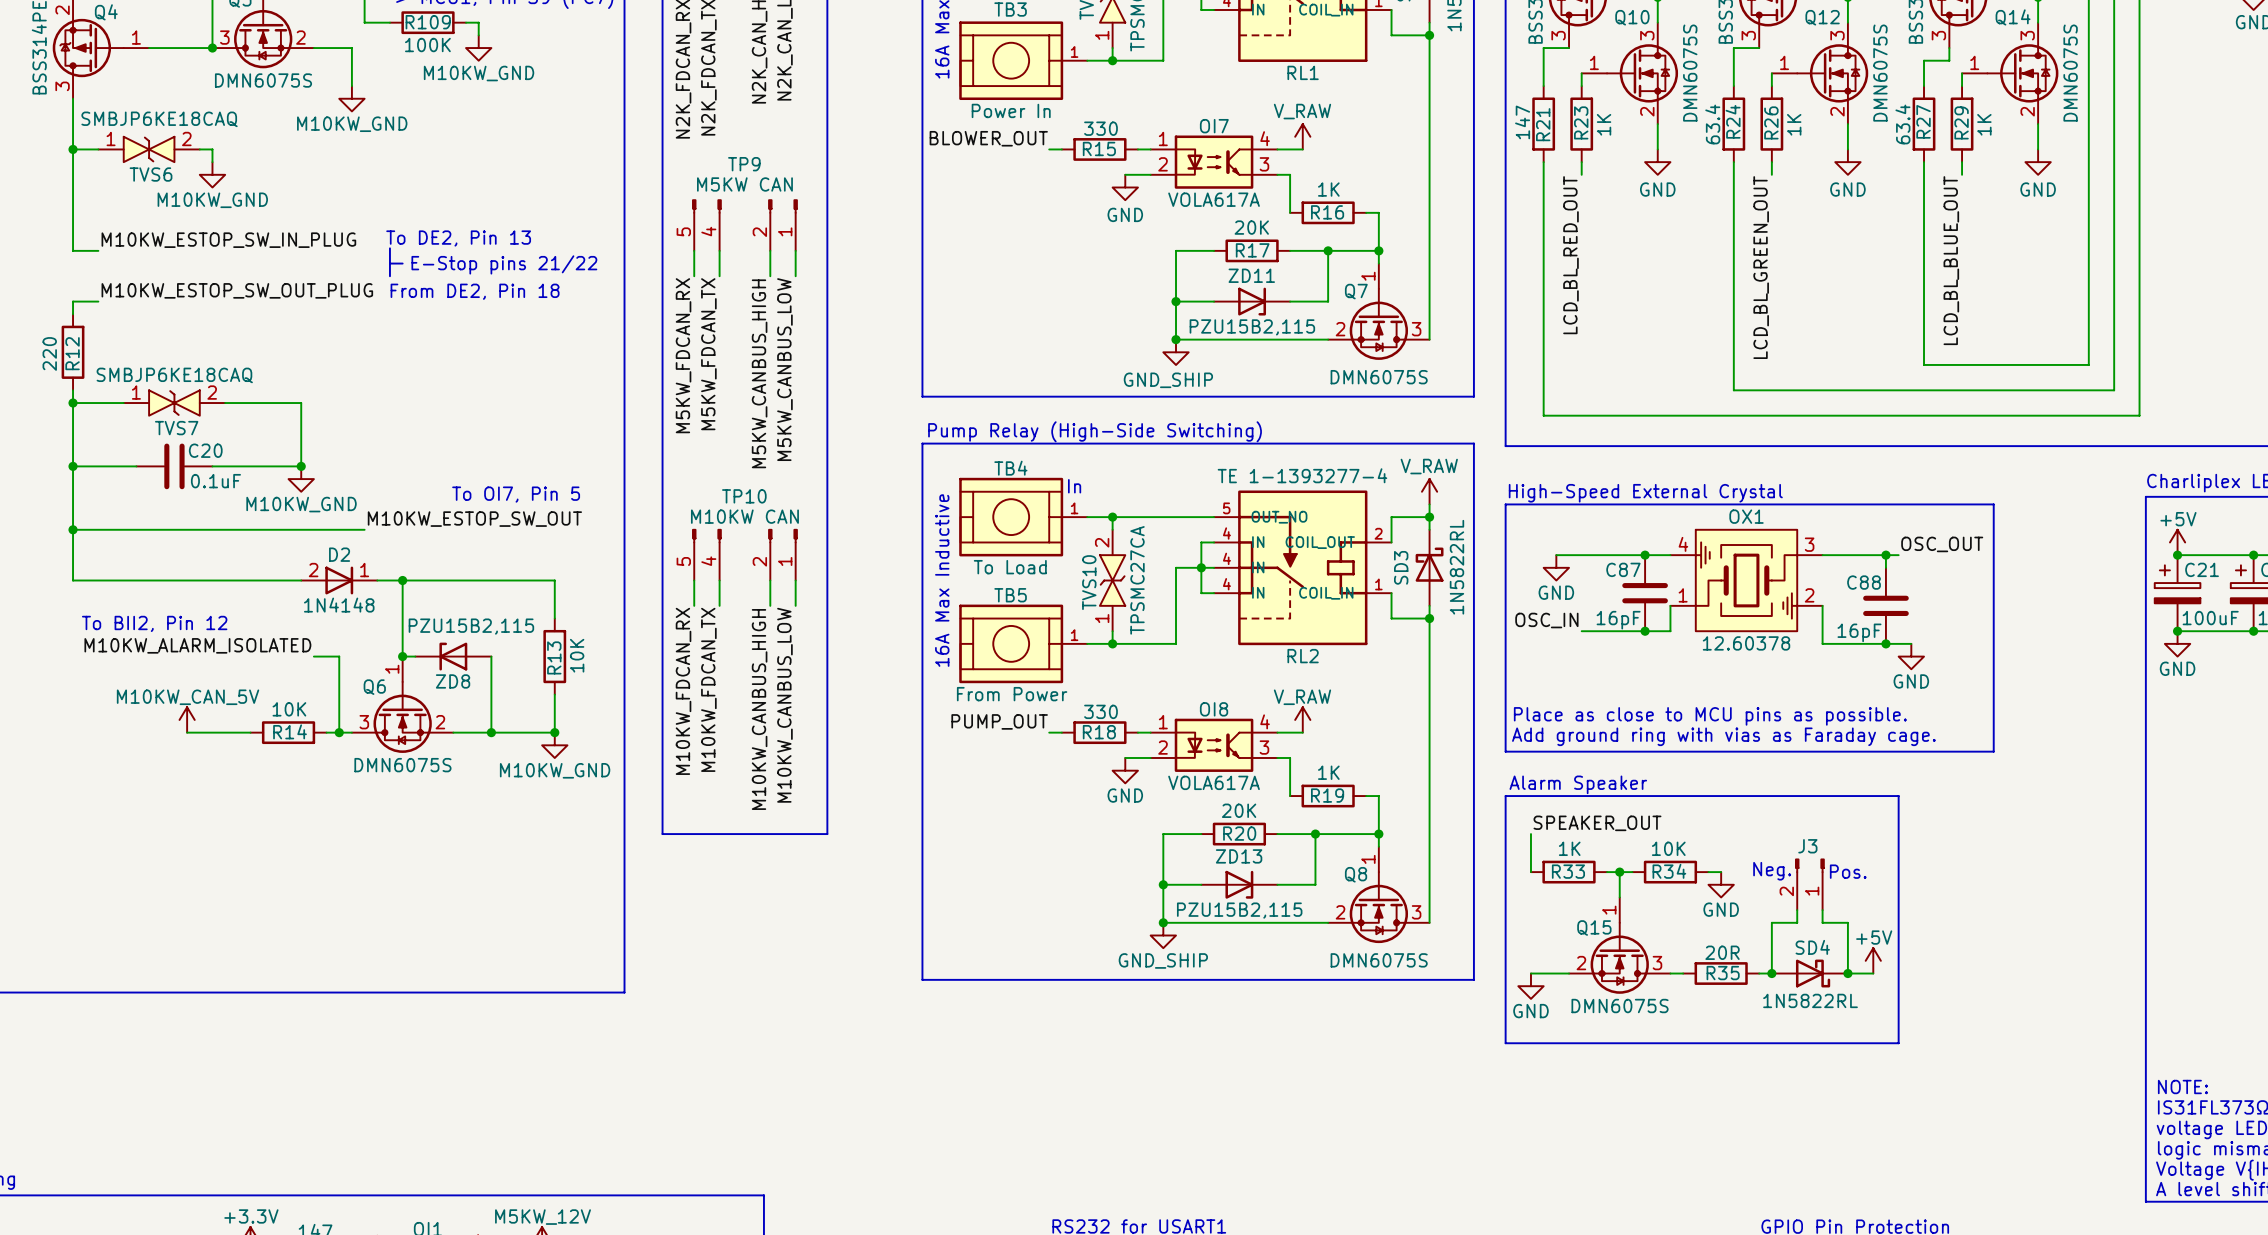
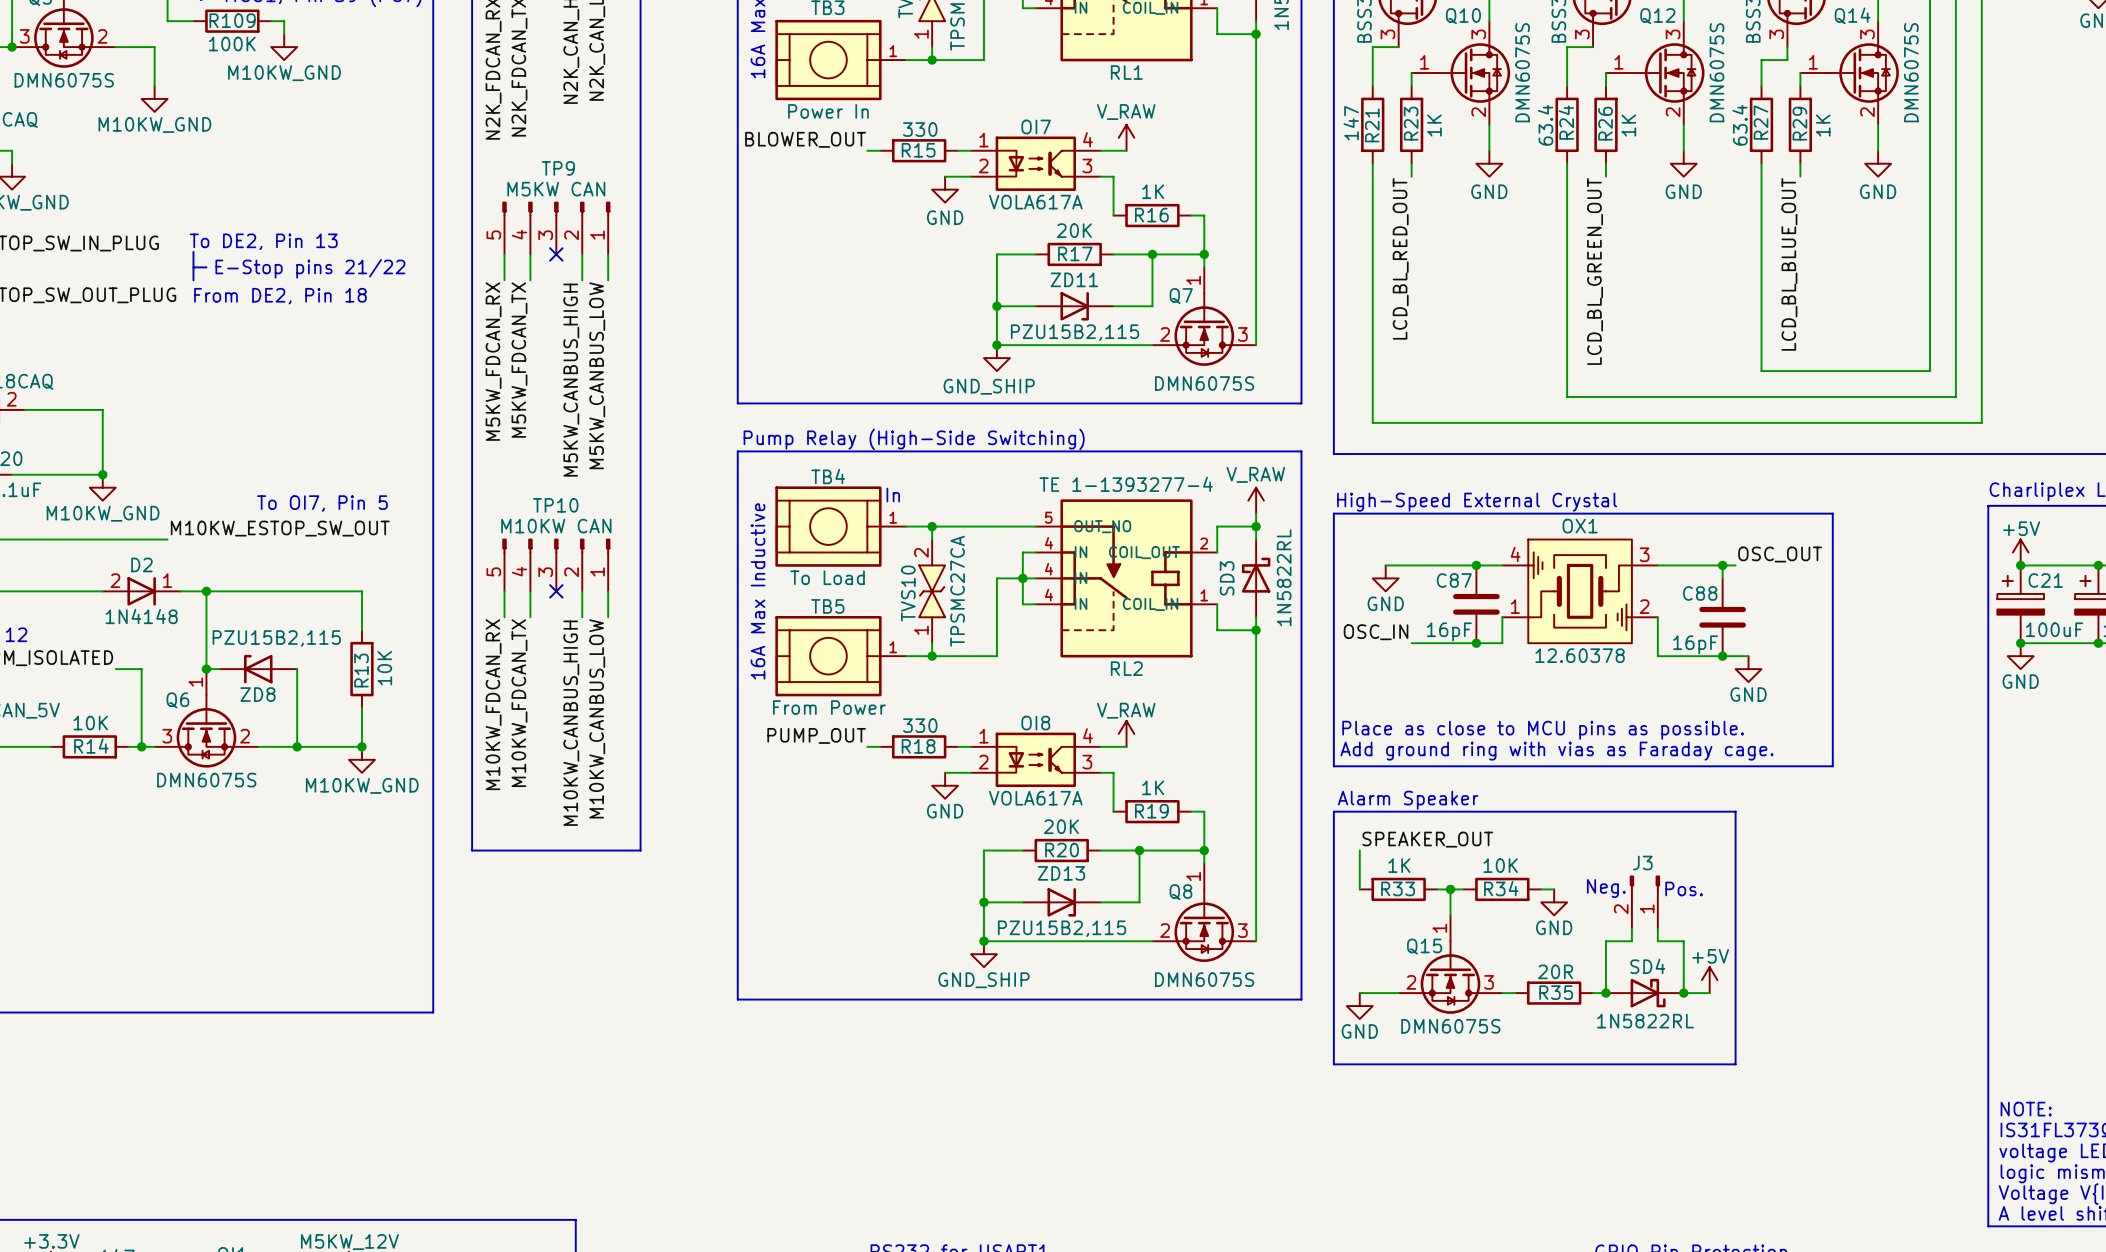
TP9 symbol: [692, 199, 798, 251] -> [502, 201, 611, 255]
no-connect mark: none -> (556, 254)
TP10 symbol: [692, 529, 798, 581] -> [502, 538, 611, 592]
no-connect mark: none -> (556, 591)

